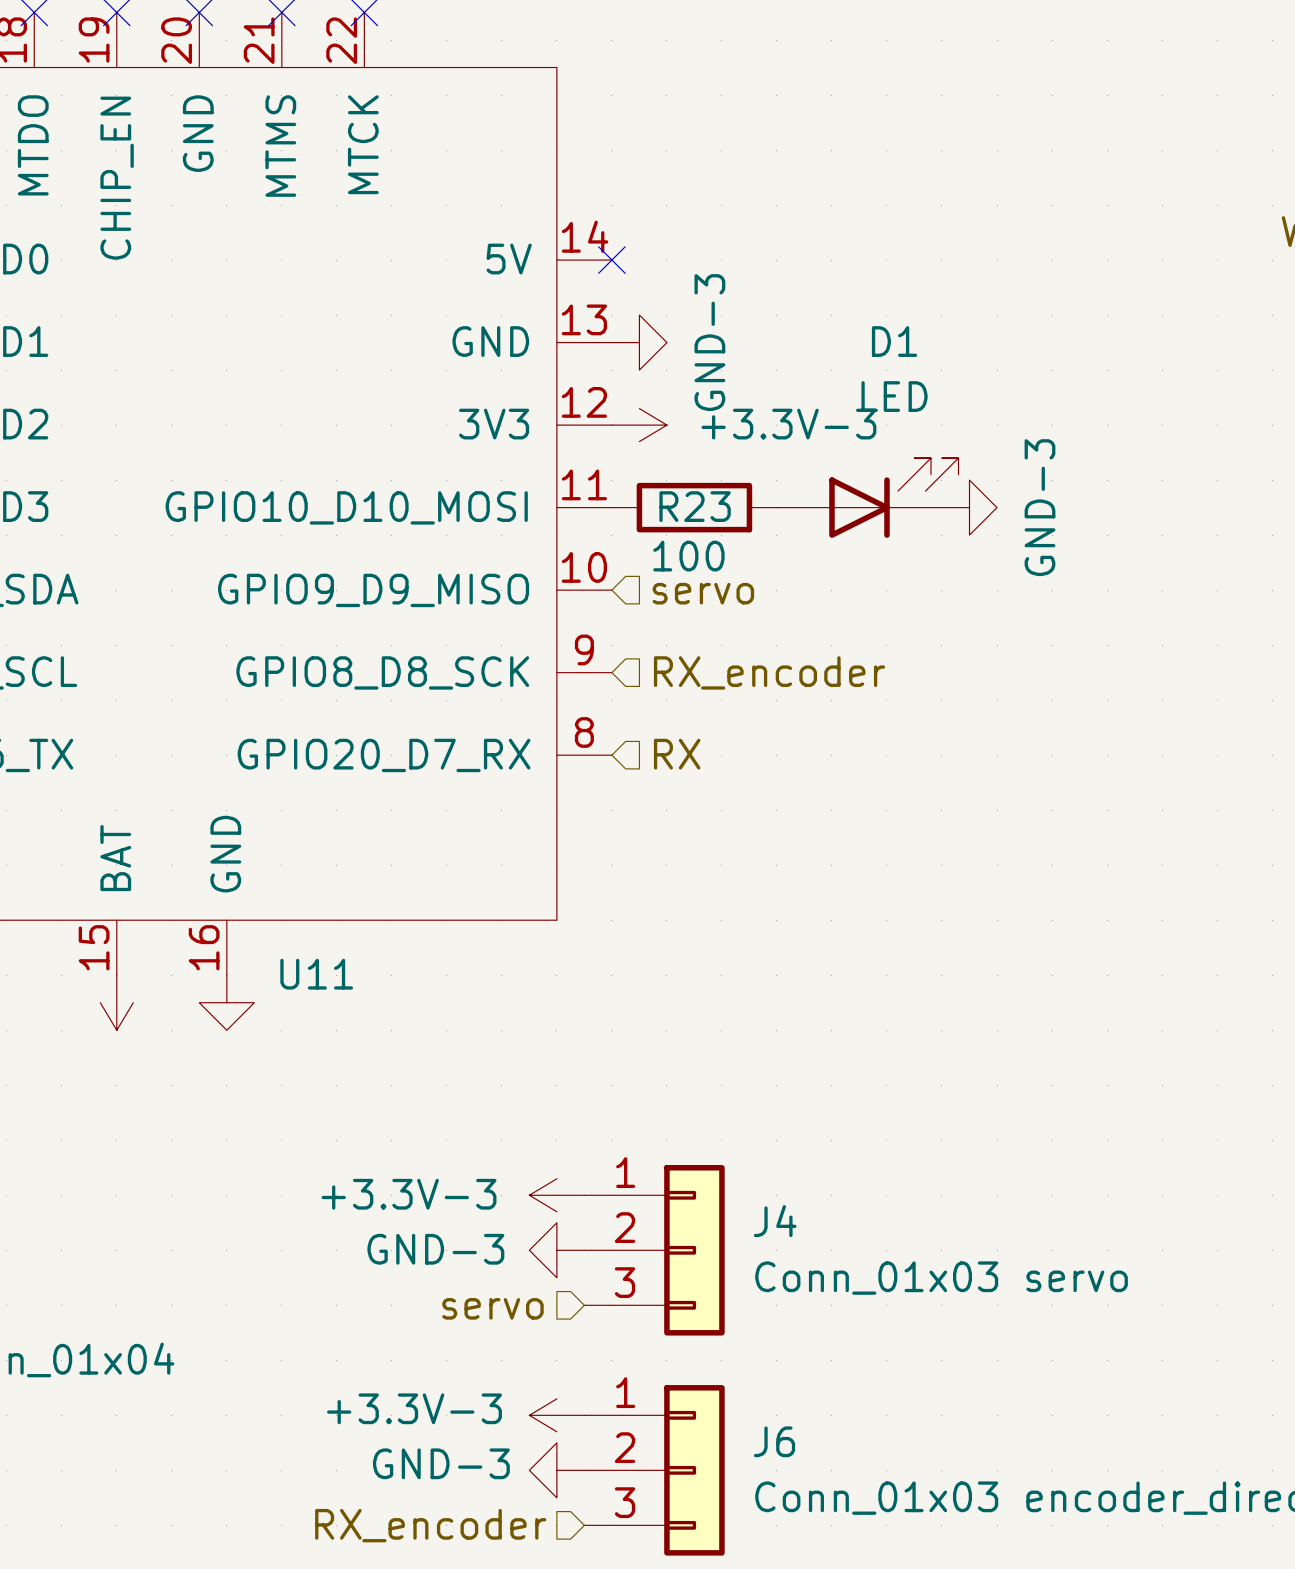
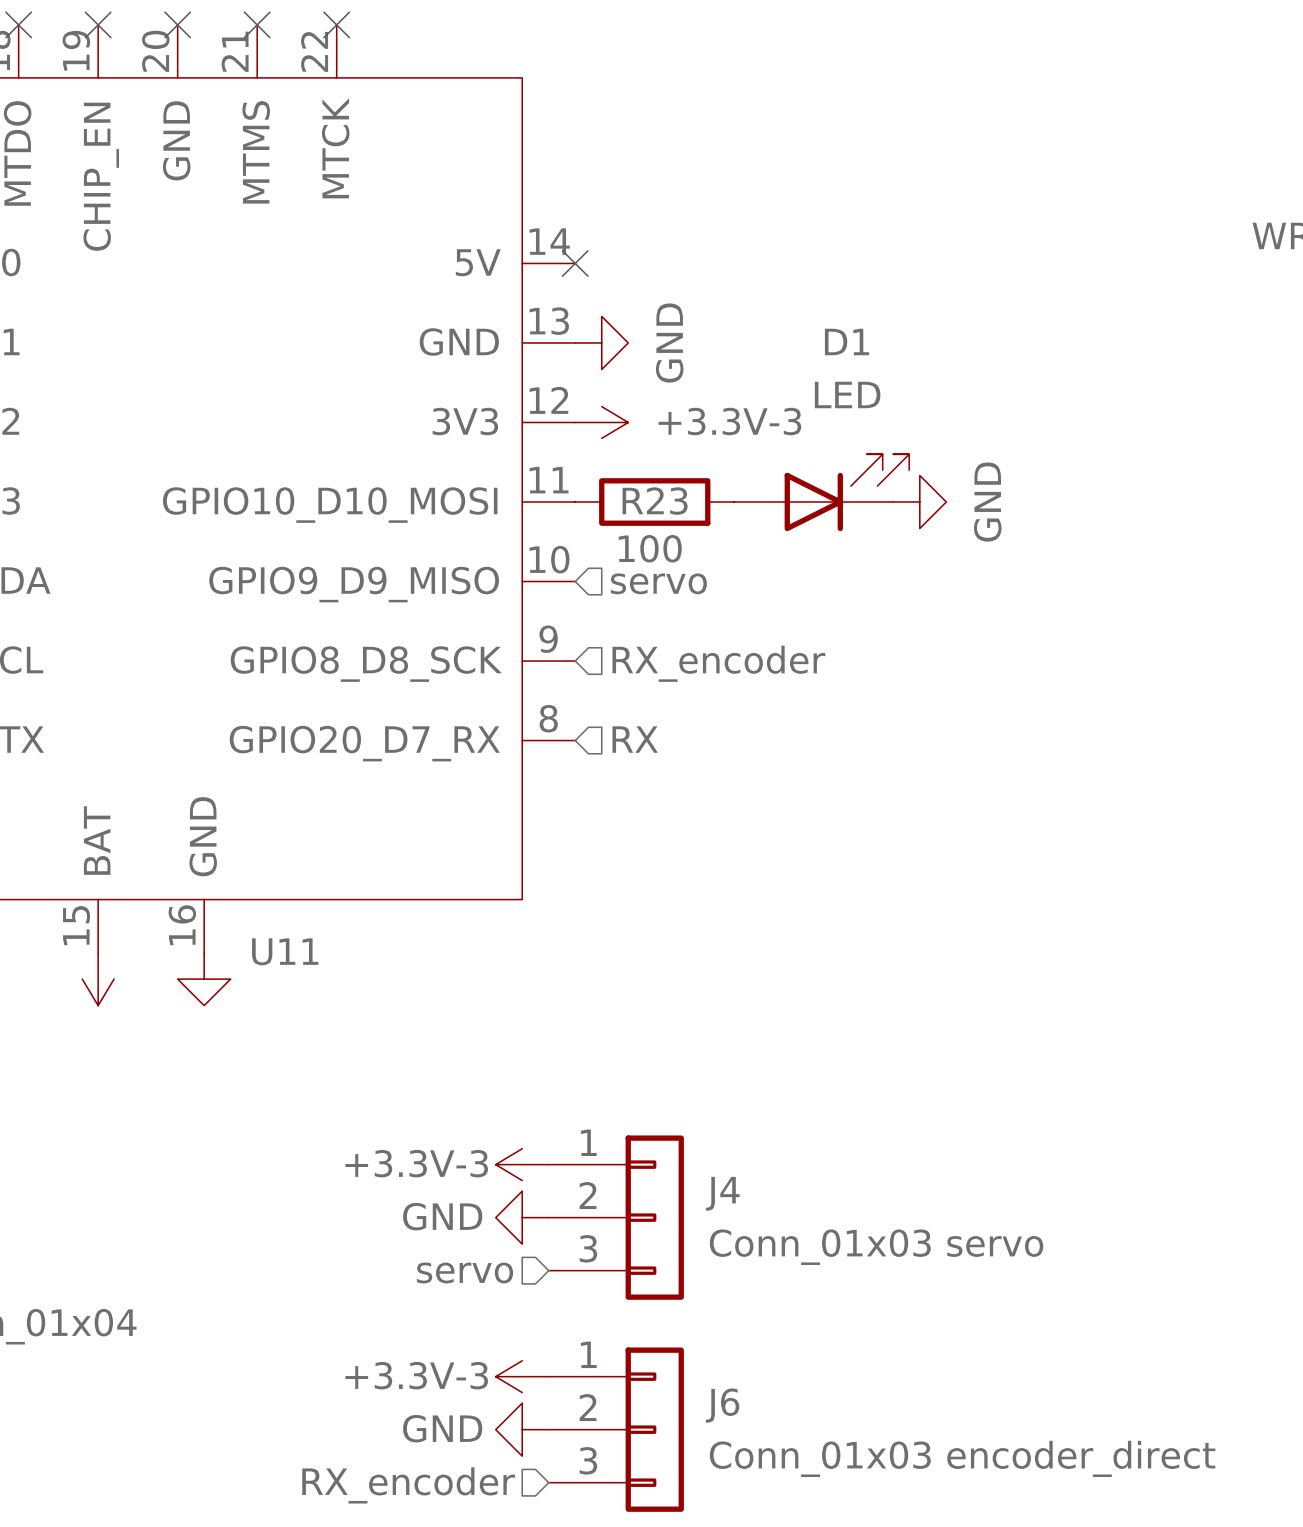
power symbol: GND-3 (639, 342) -> GND (601, 342)
power symbol: GND-3 (969, 507) -> GND (919, 502)
power symbol text position: +3.3V-3 (409, 1194) -> +3.3V-3 (416, 1163)
power symbol: GND-3 (556, 1250) -> GND (522, 1217)
power symbol text position: +3.3V-3 (414, 1408) -> +3.3V-3 (416, 1375)
power symbol: GND-3 (556, 1470) -> GND (522, 1429)

